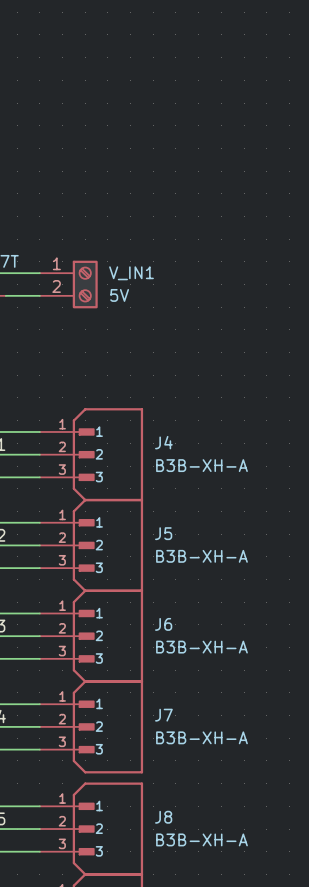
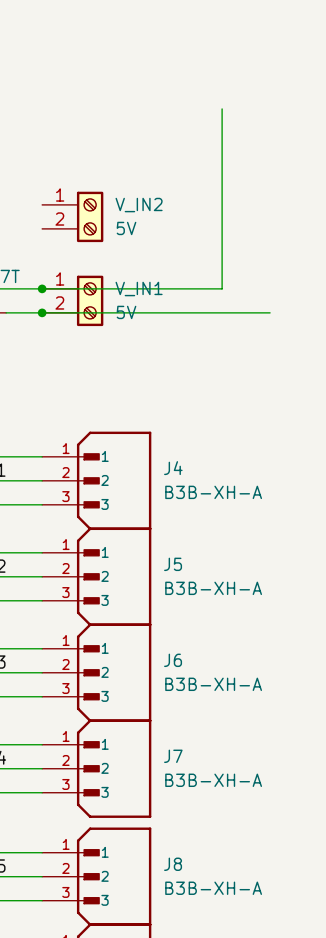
wire: none -> (222, 108) (222, 288) (42, 288)
V_IN2: none -> 5V (72, 216)
junction: none -> (42, 288)
wire: none -> (42, 312) (270, 312)
junction: none -> (42, 312)

